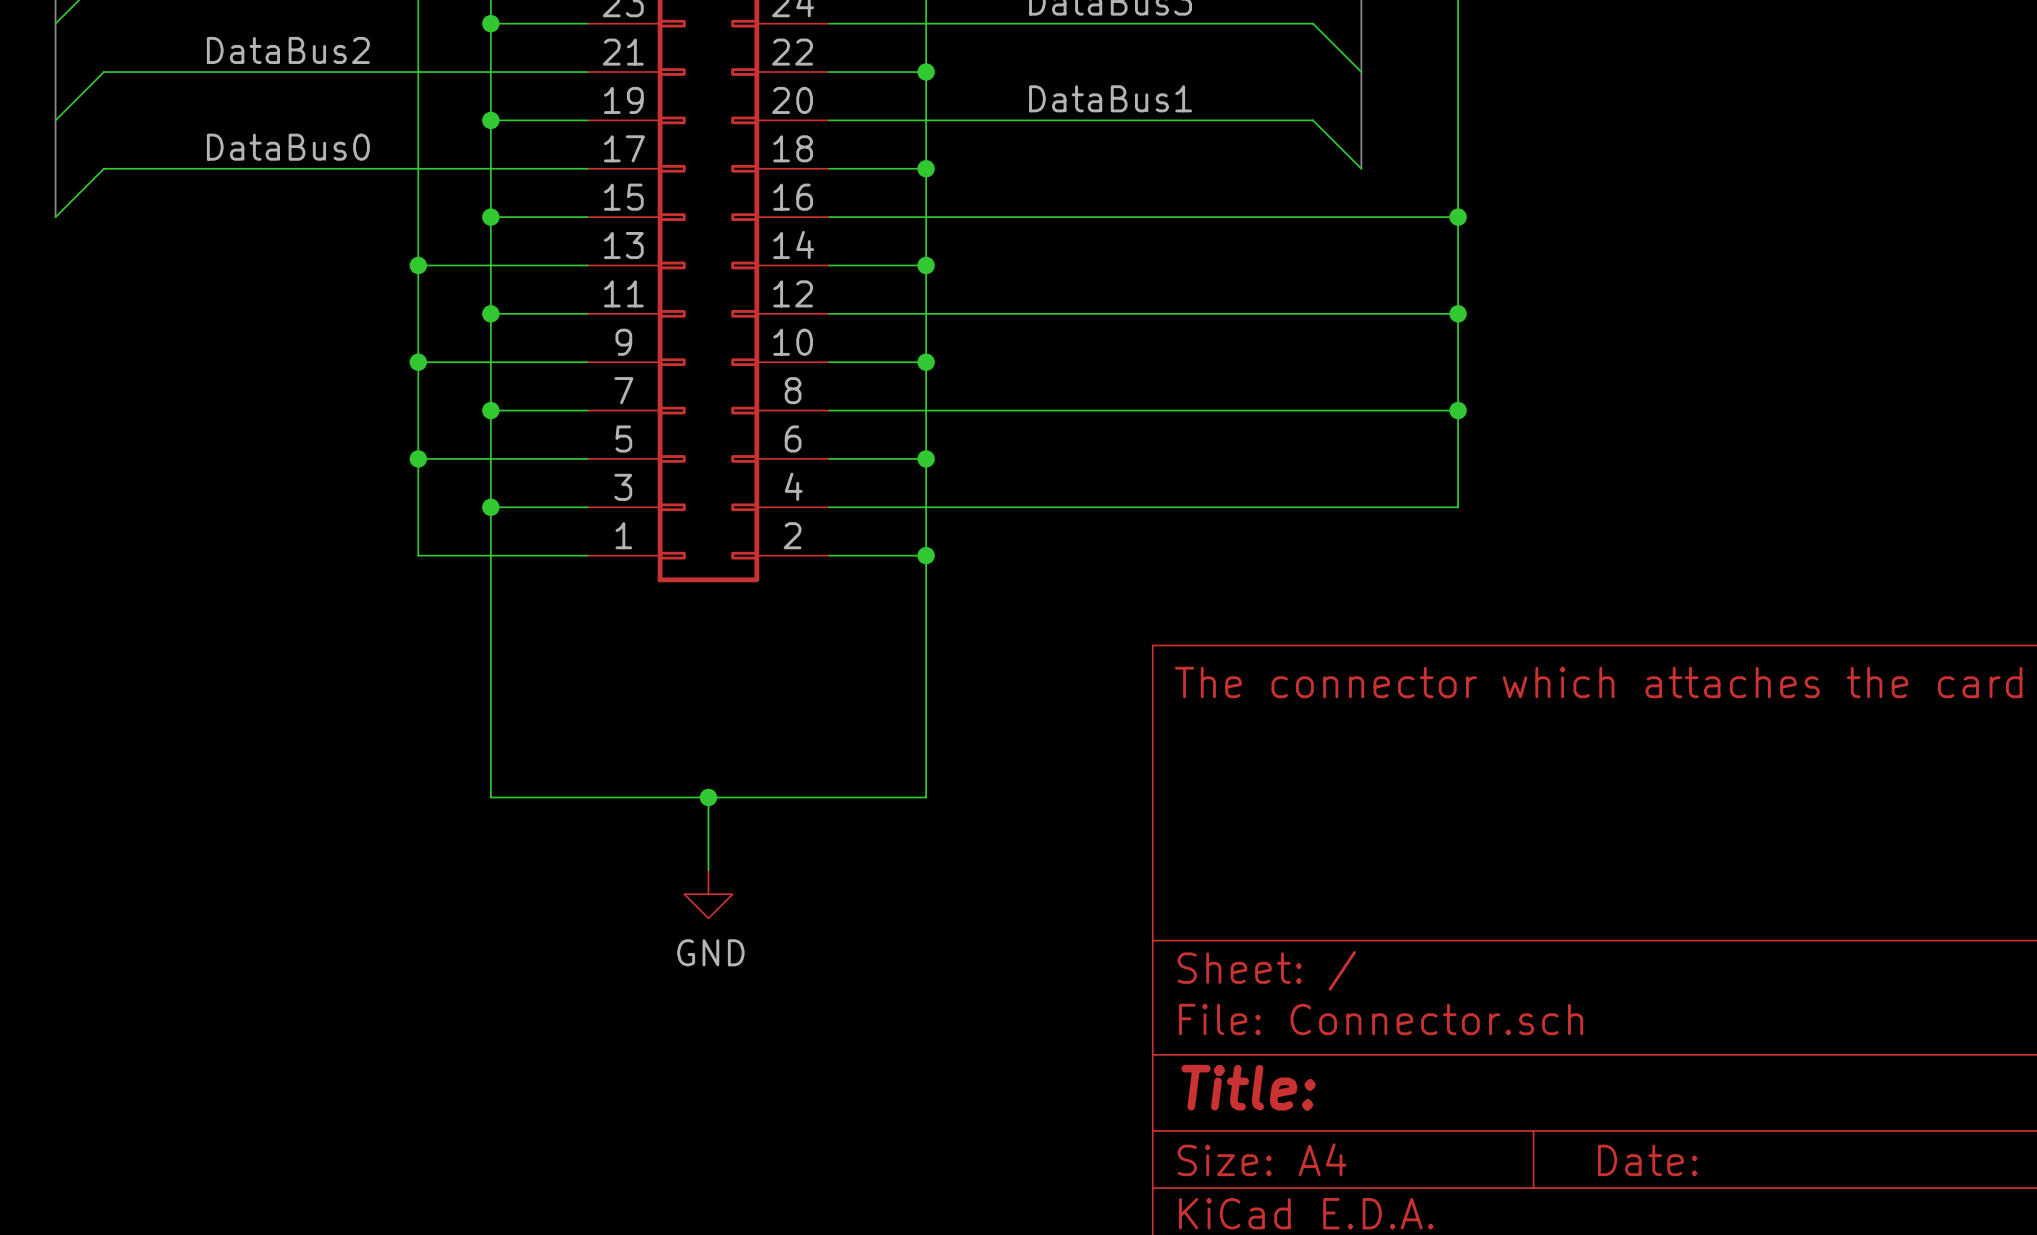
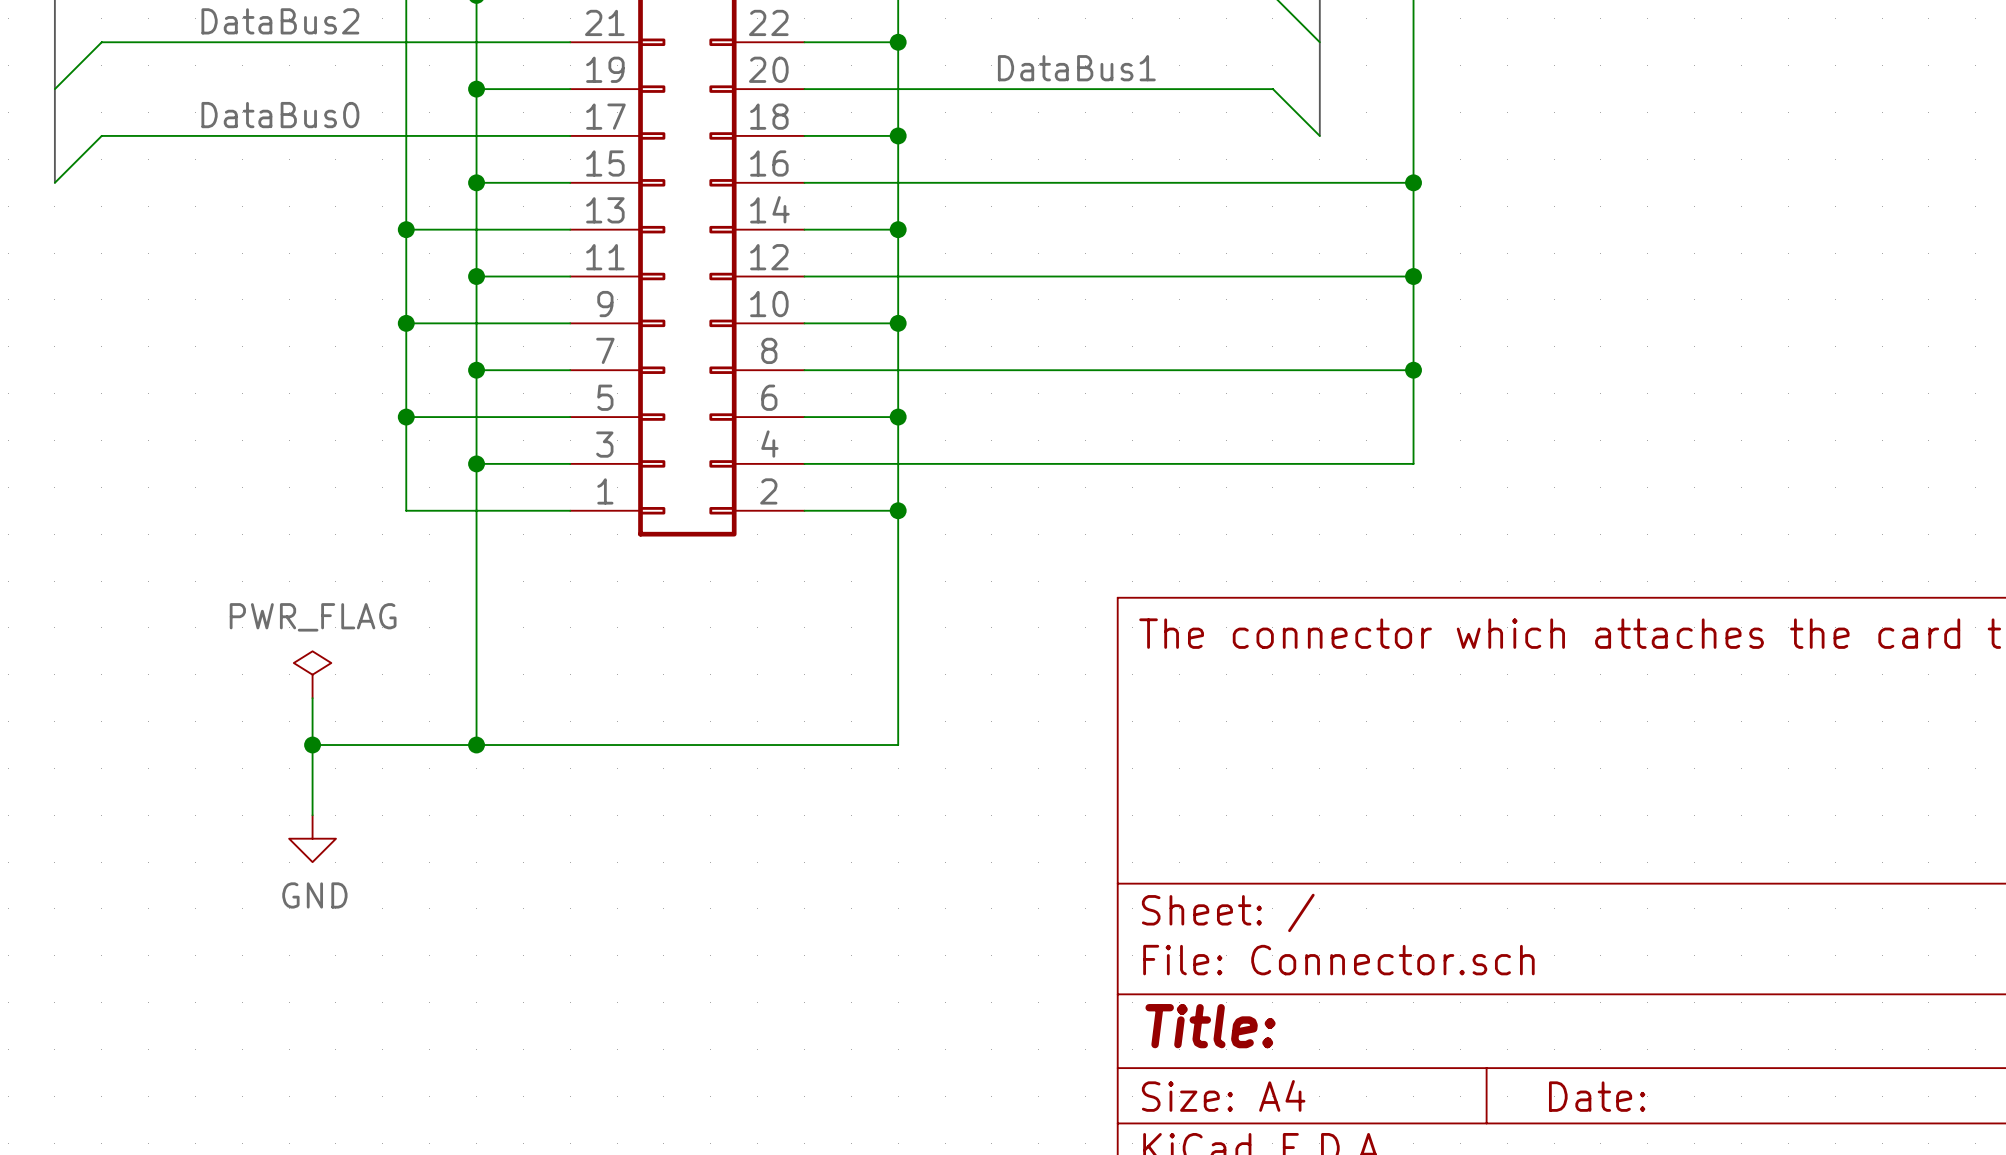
power symbol: none -> PWR_FLAG (312, 674)
wire: none -> (312, 698) (312, 815)
wire: none -> (312, 745) (476, 745)
junction: none -> (312, 745)
junction: none -> (476, 745)
wire: (708, 797) (708, 870) -> none
junction: (708, 797) -> none
power symbol position: GND (708, 894) -> GND (312, 838)

